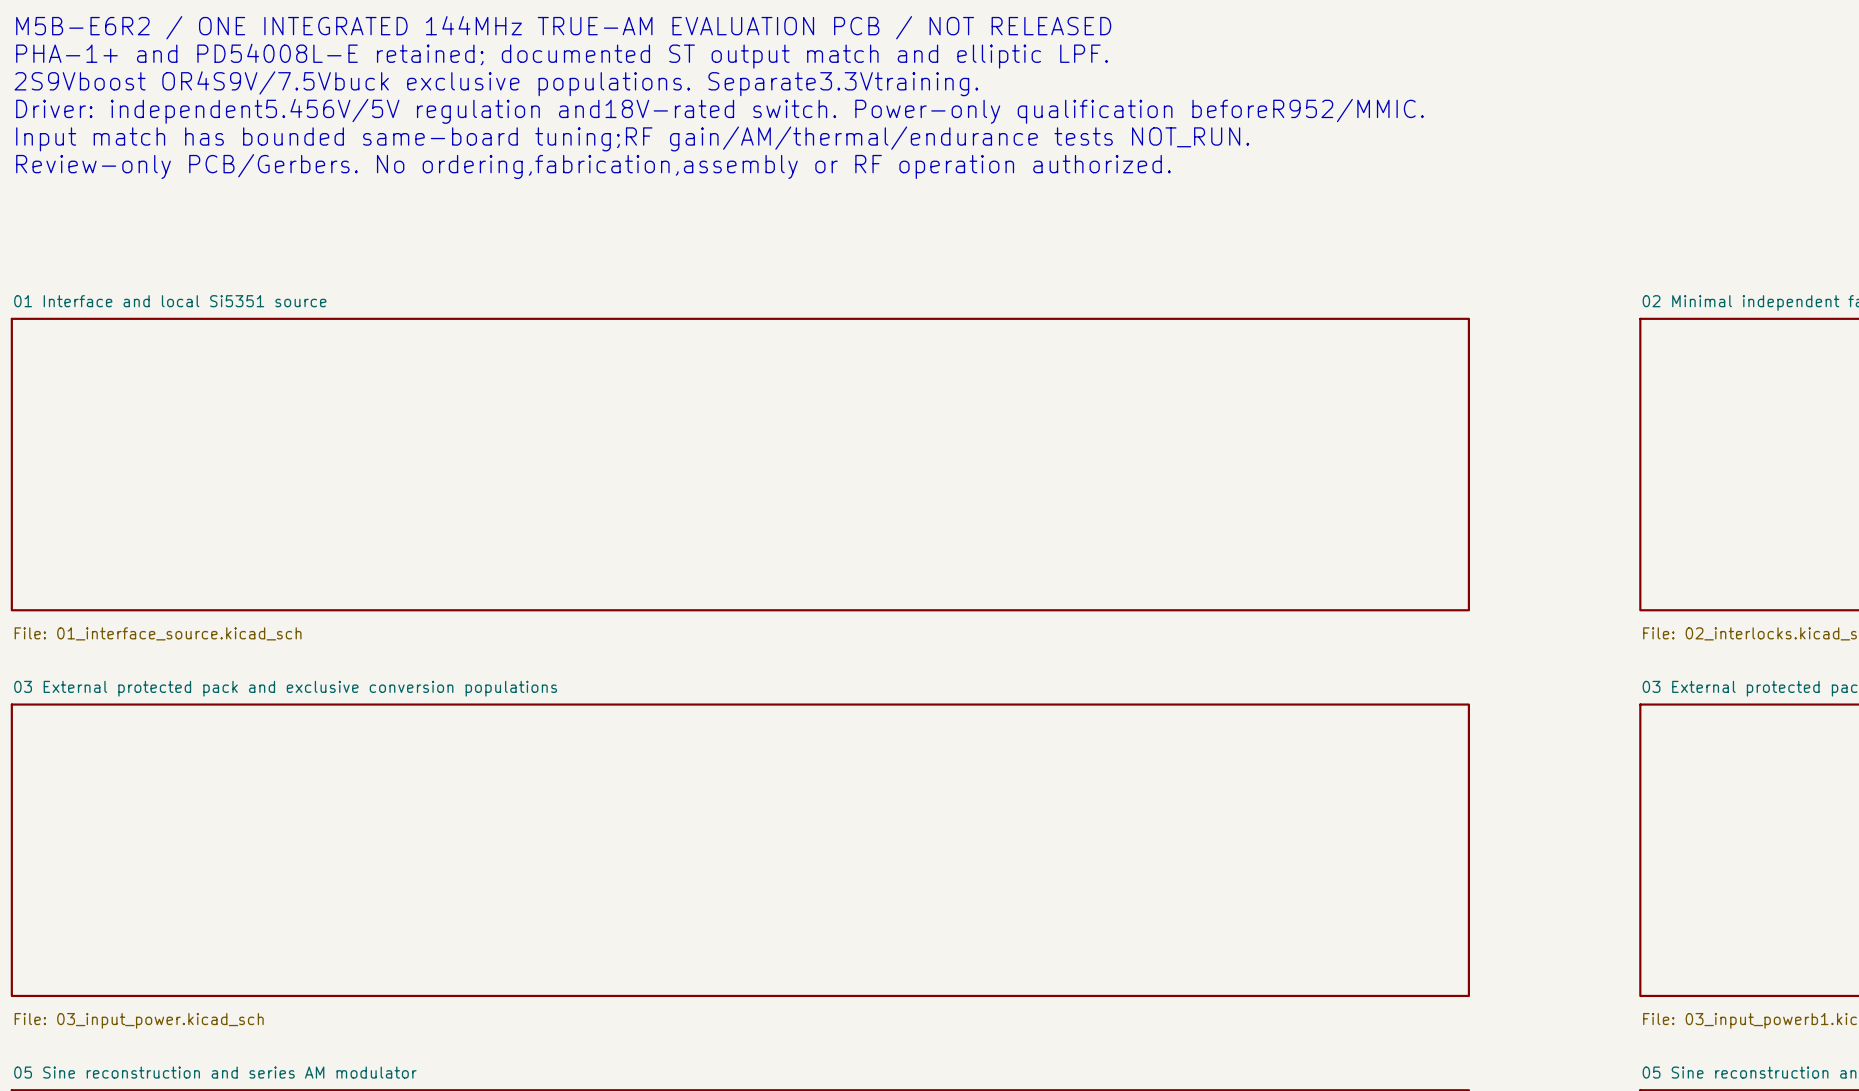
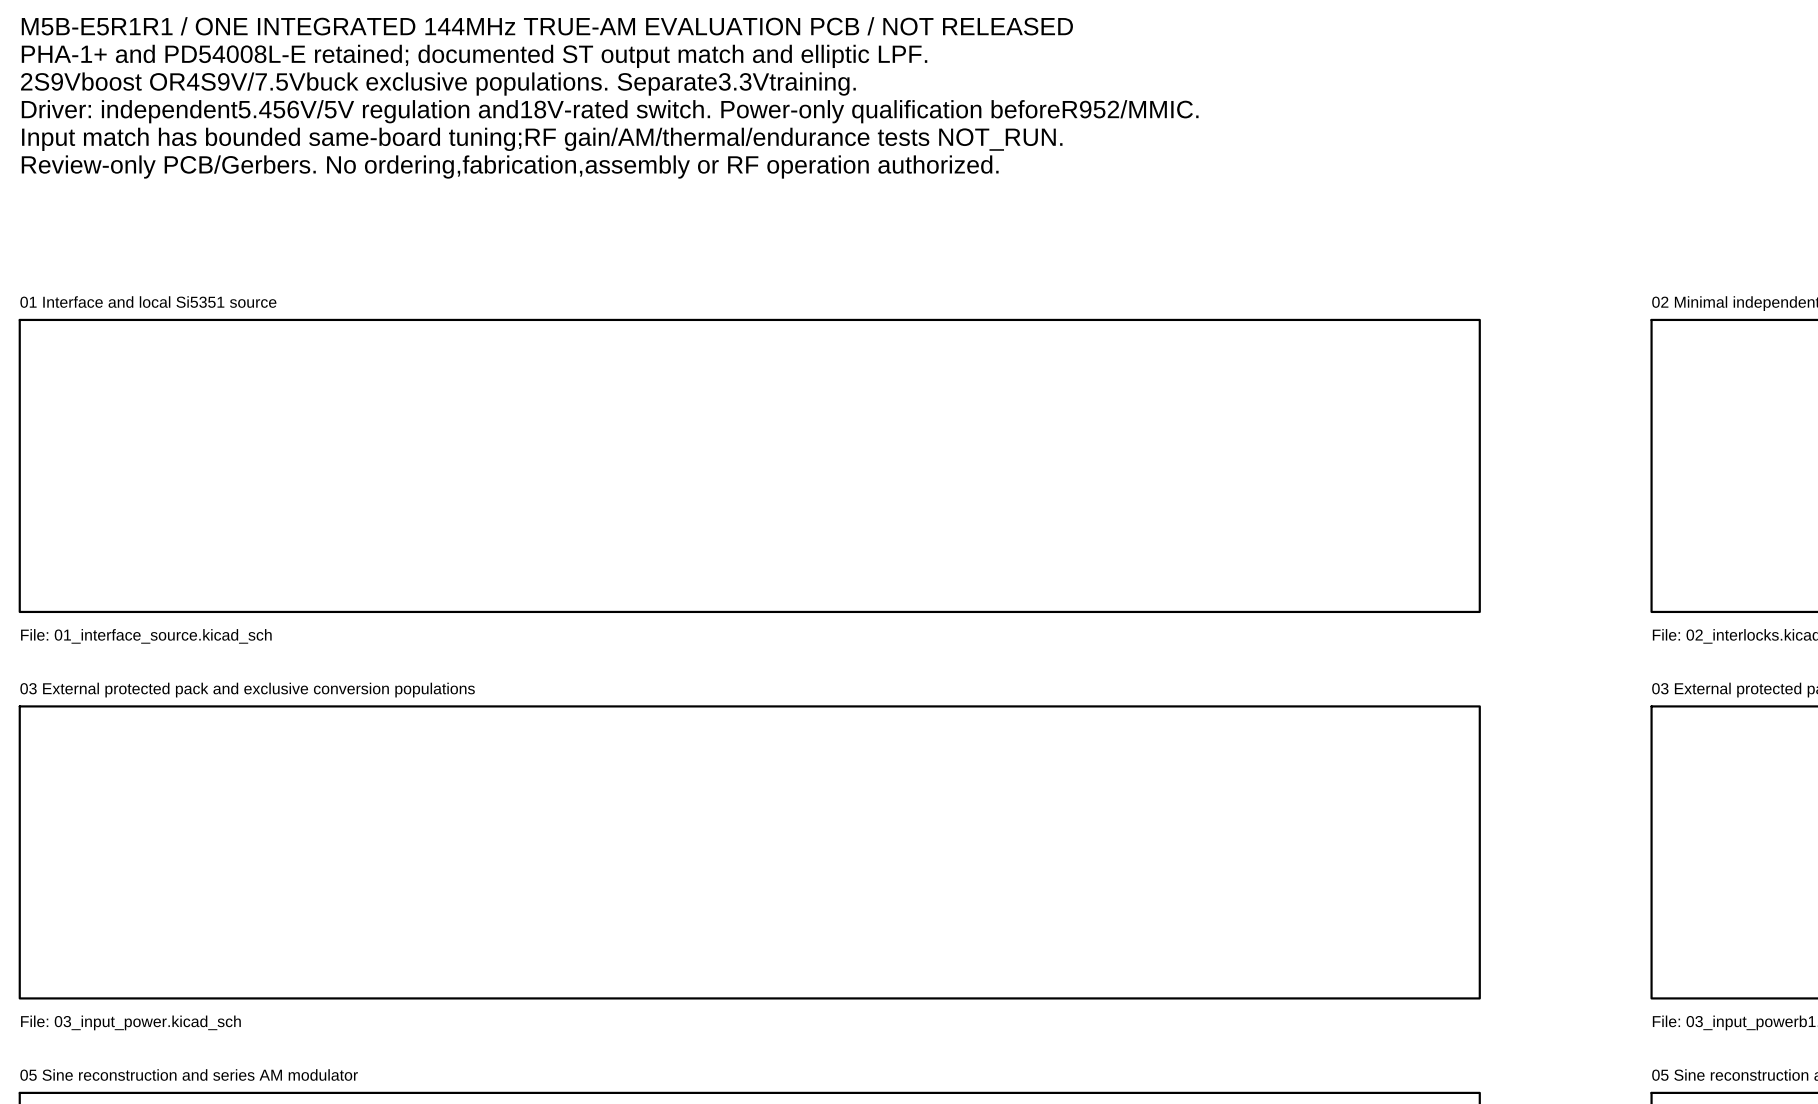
text: M5B-E6R2 / ONE INTEGRATED 144MHz TRUE-AM EVALUATION PCB / NOT RELEASED (563, 27) -> M5B-E5R1R1 / ONE INTEGRATED 144MHz TRUE-AM EVALUATION PCB / NOT RELEASED (547, 26)

